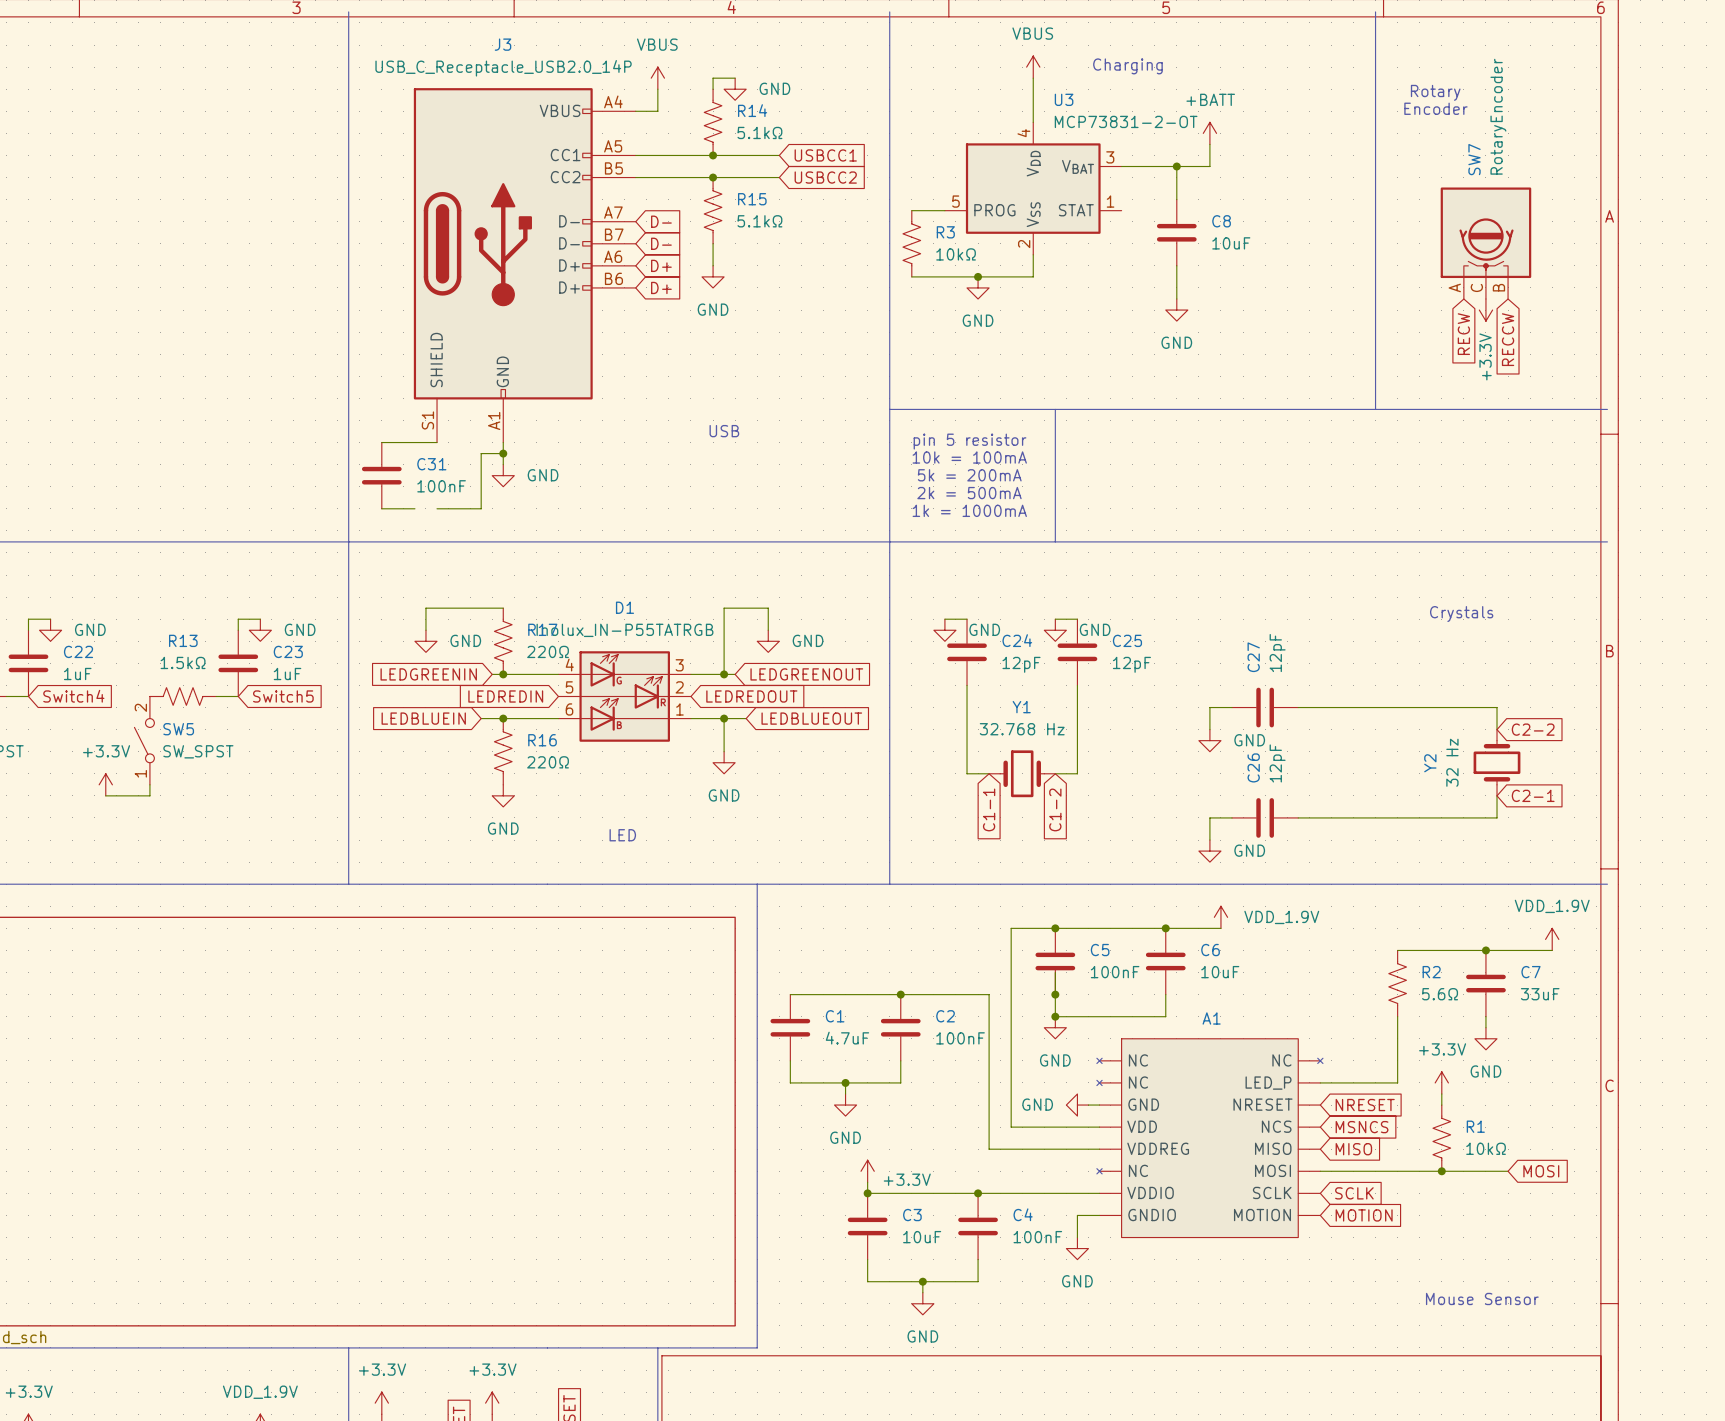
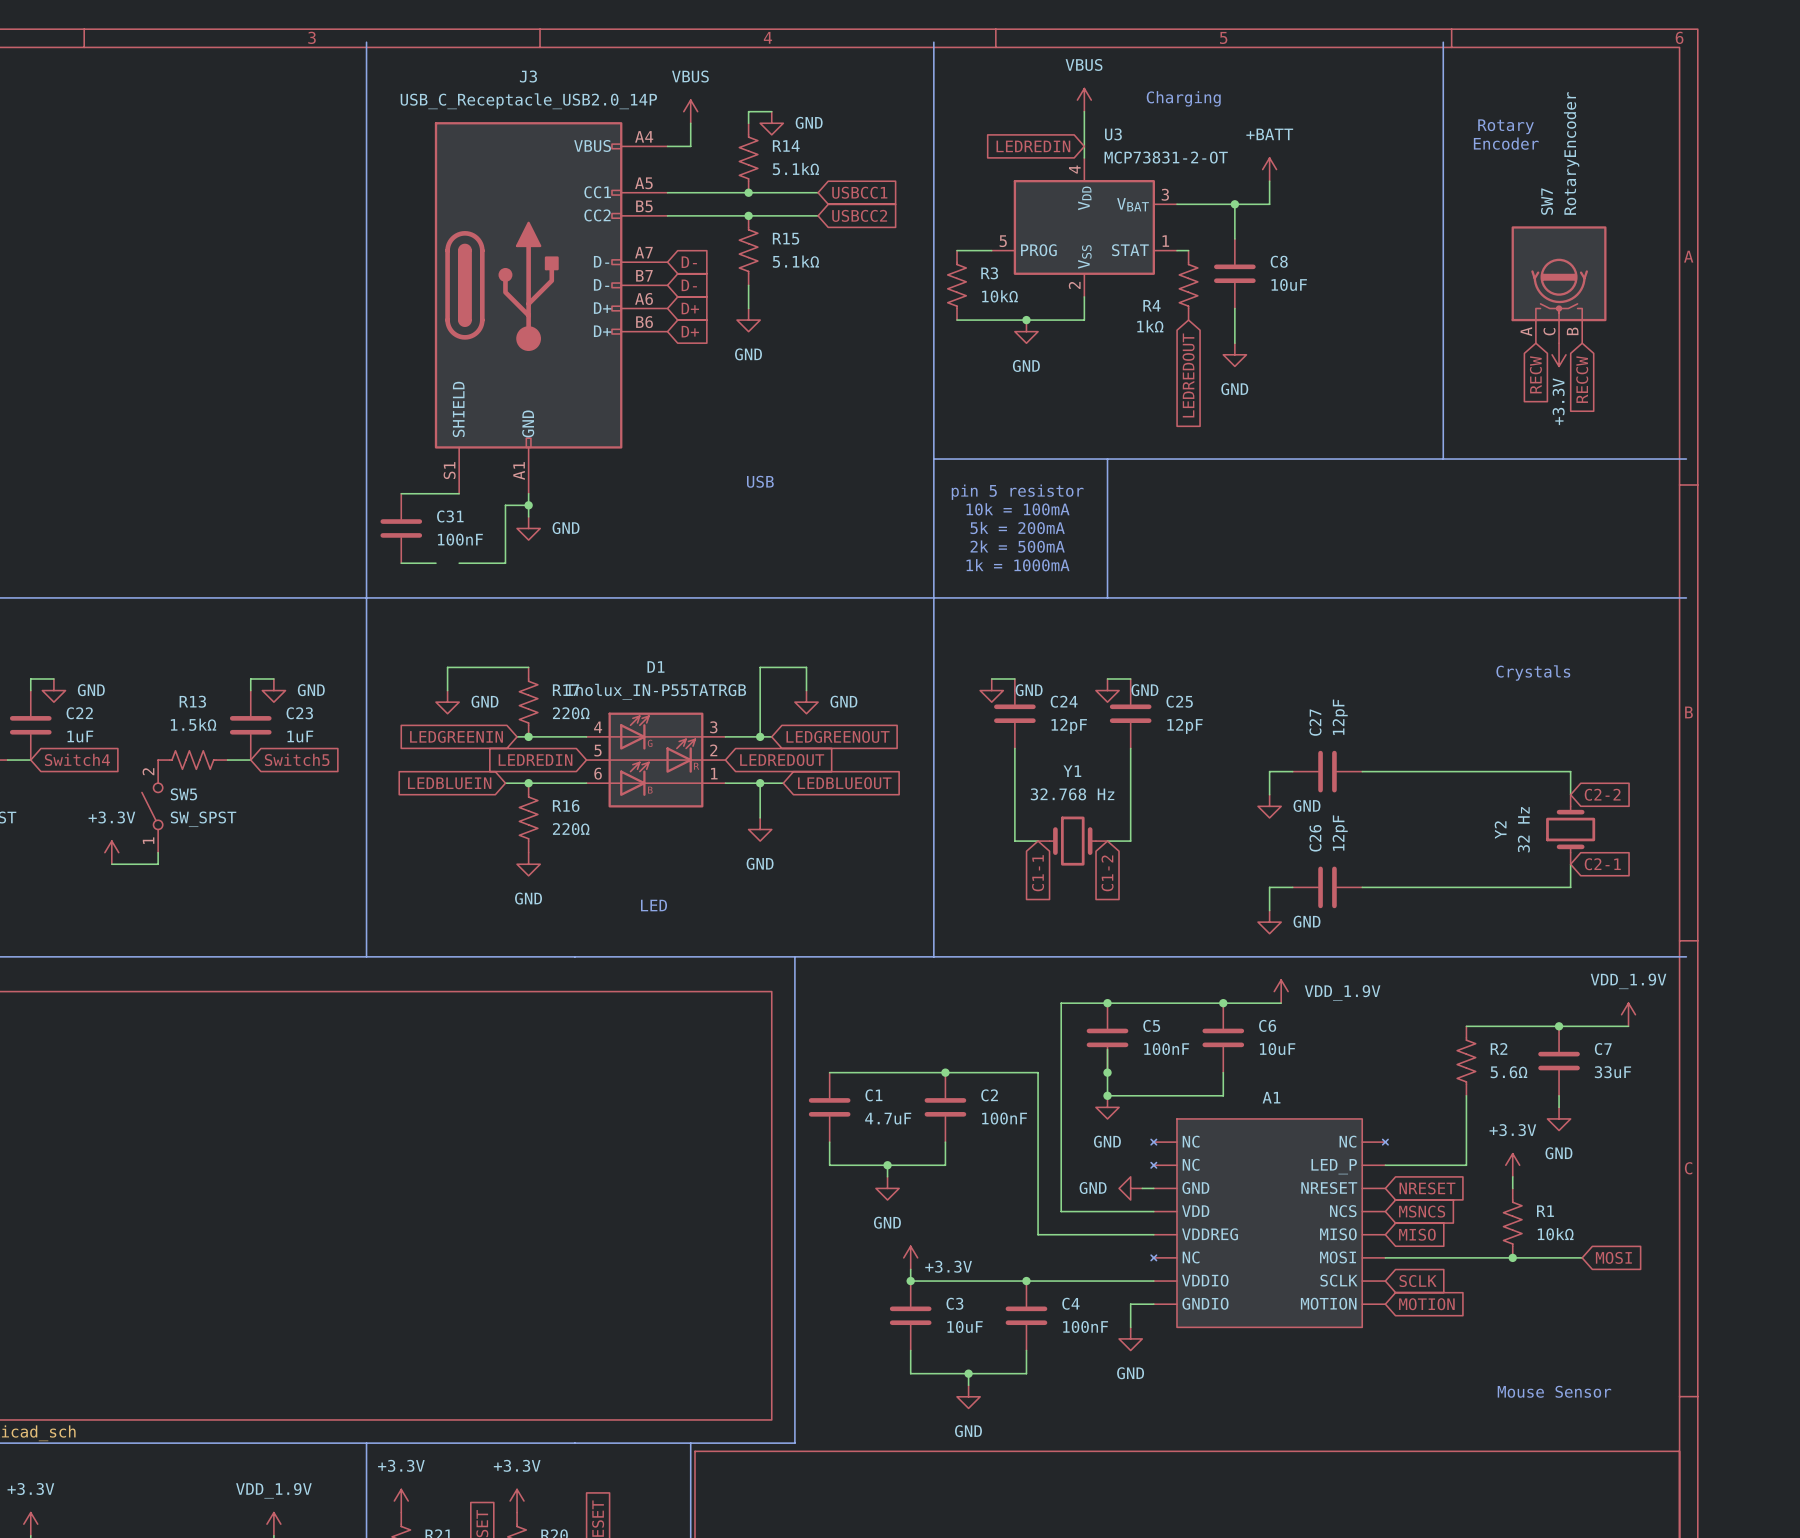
global label: none -> LEDREDIN (1033, 146)
wire: none -> (1176, 250) (1188, 250)
R4: none -> 1kΩ (1188, 285)
global label: none -> LEDREDOUT (1188, 375)

